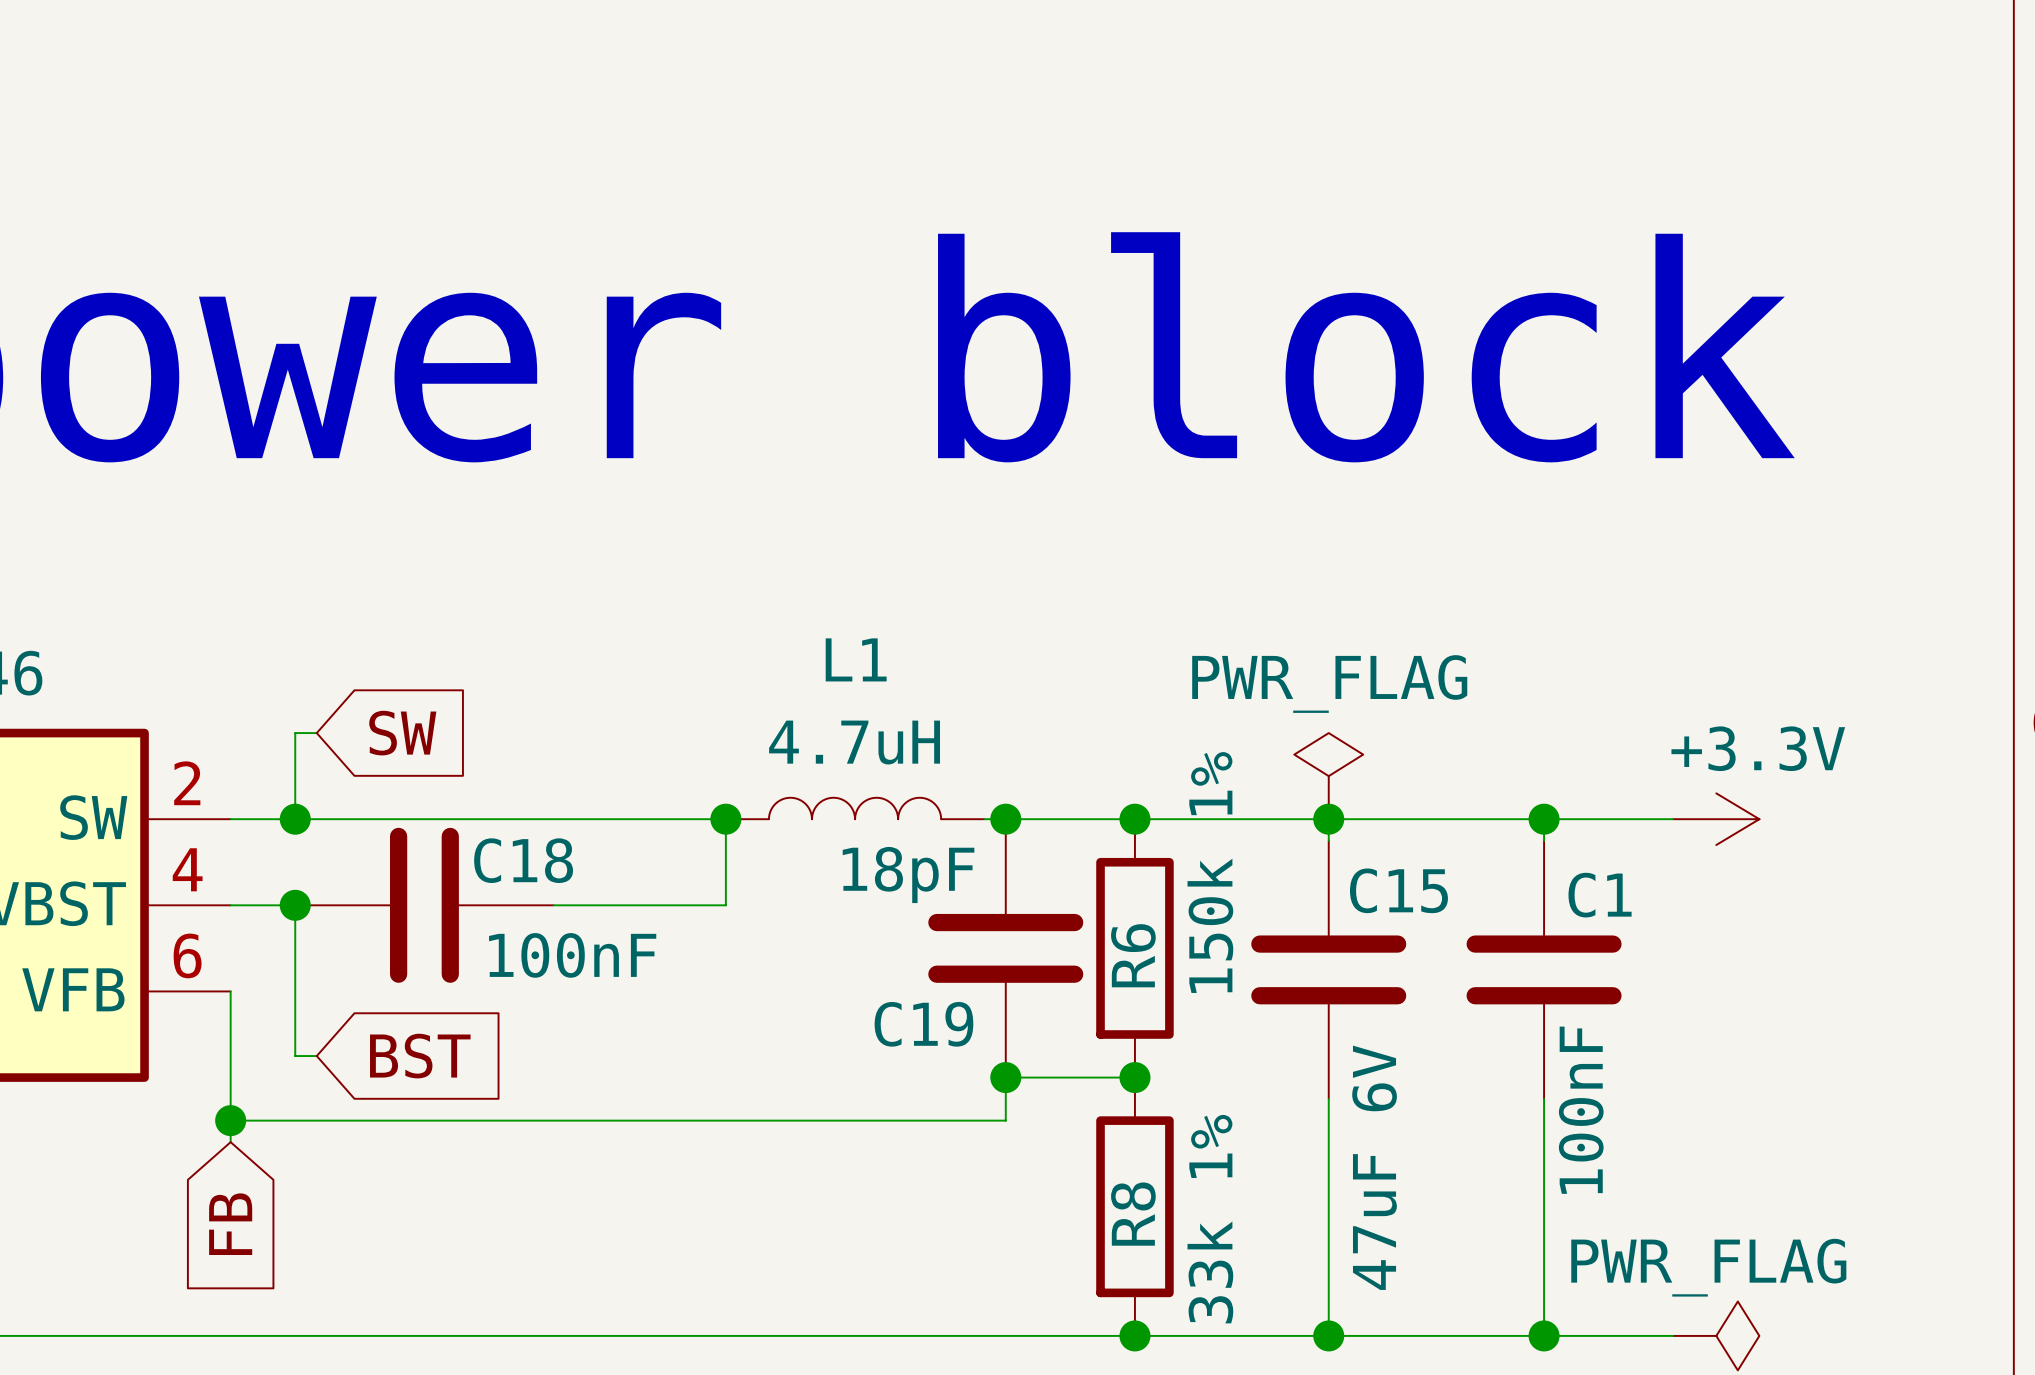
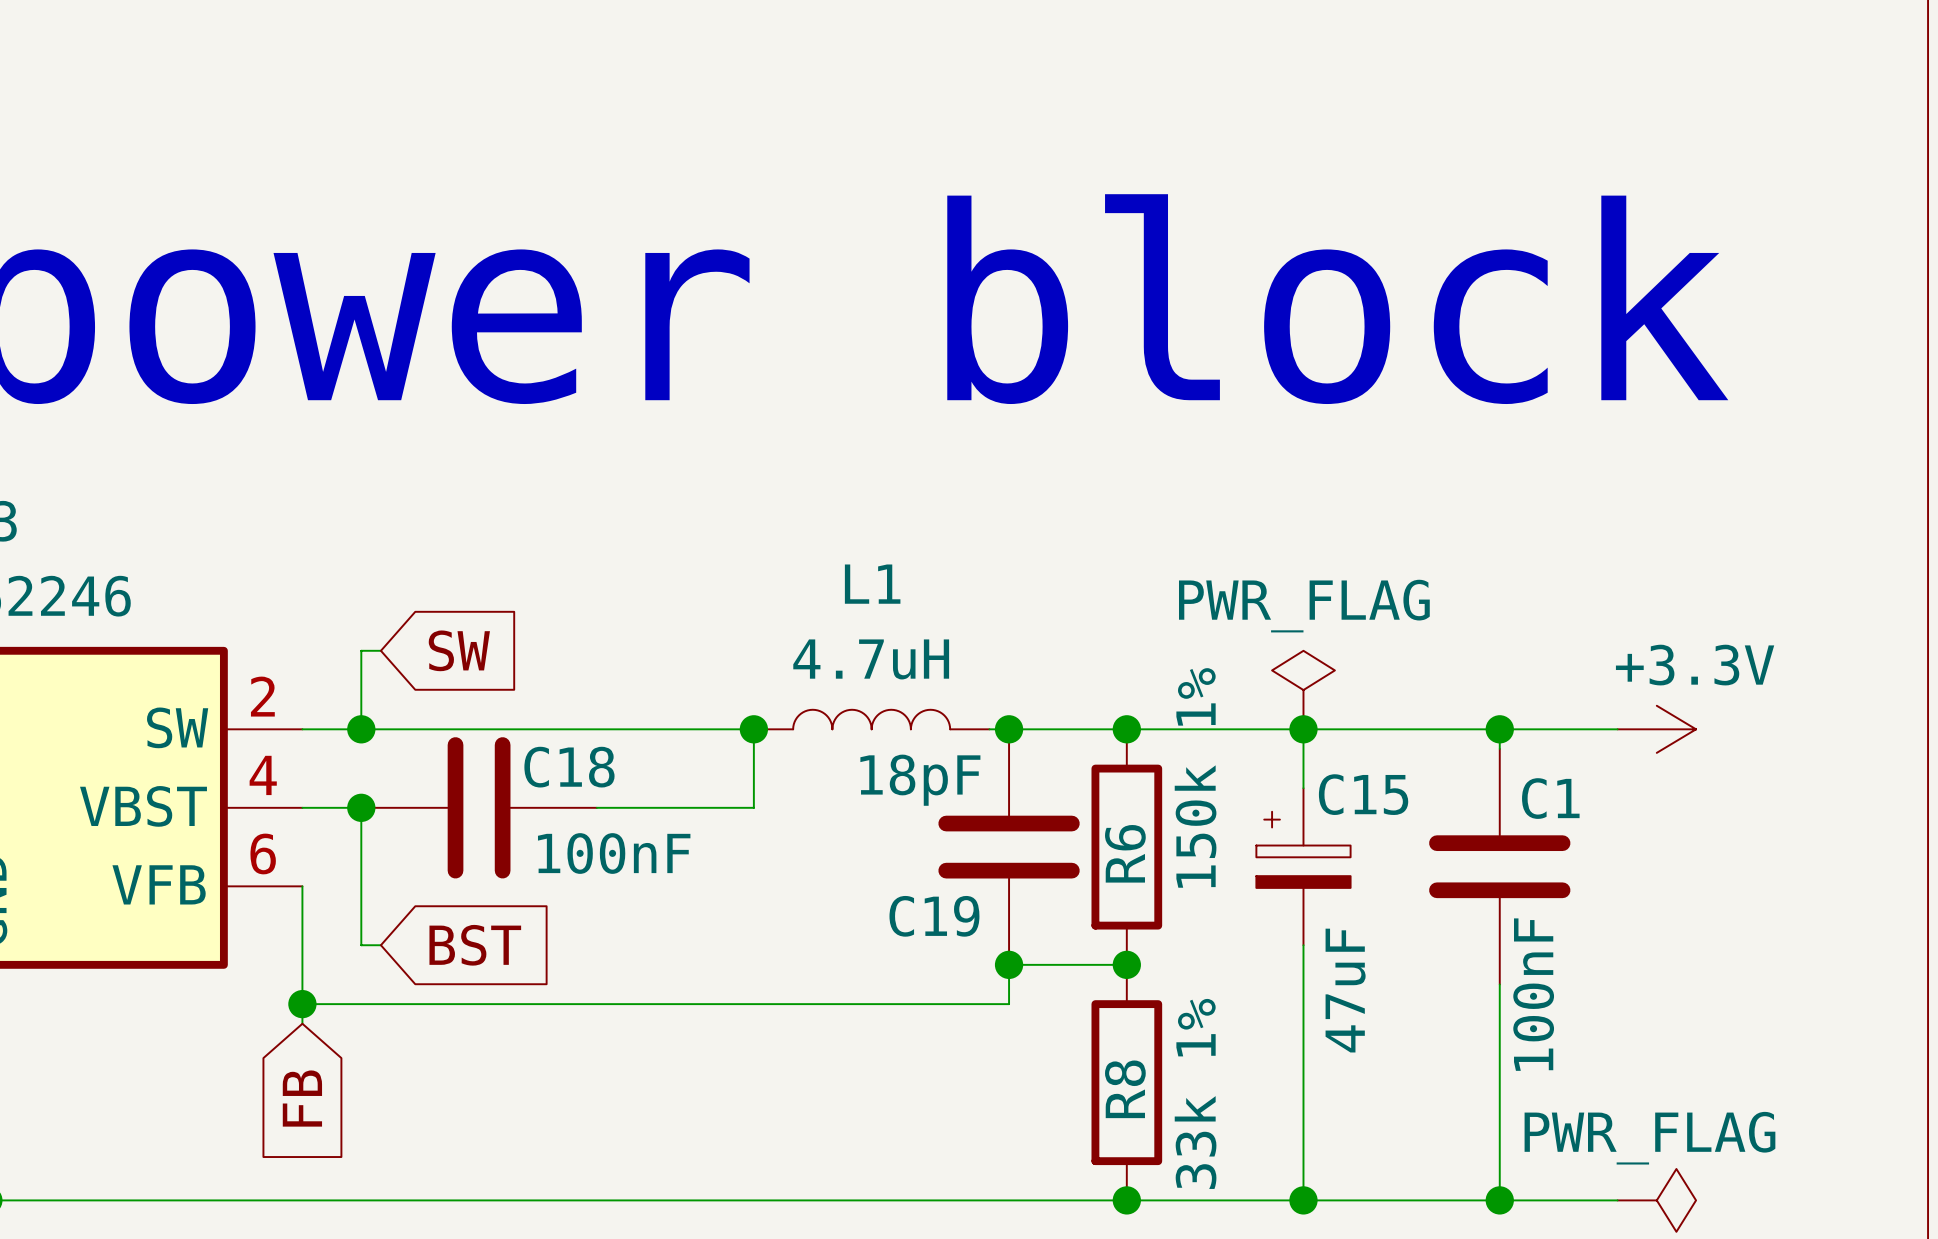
C15 symbol: [1251, 840, 1407, 1100] -> [1256, 788, 1351, 946]
C15 value: 47uF 6V (1374, 1167) -> 47uF (1345, 990)

